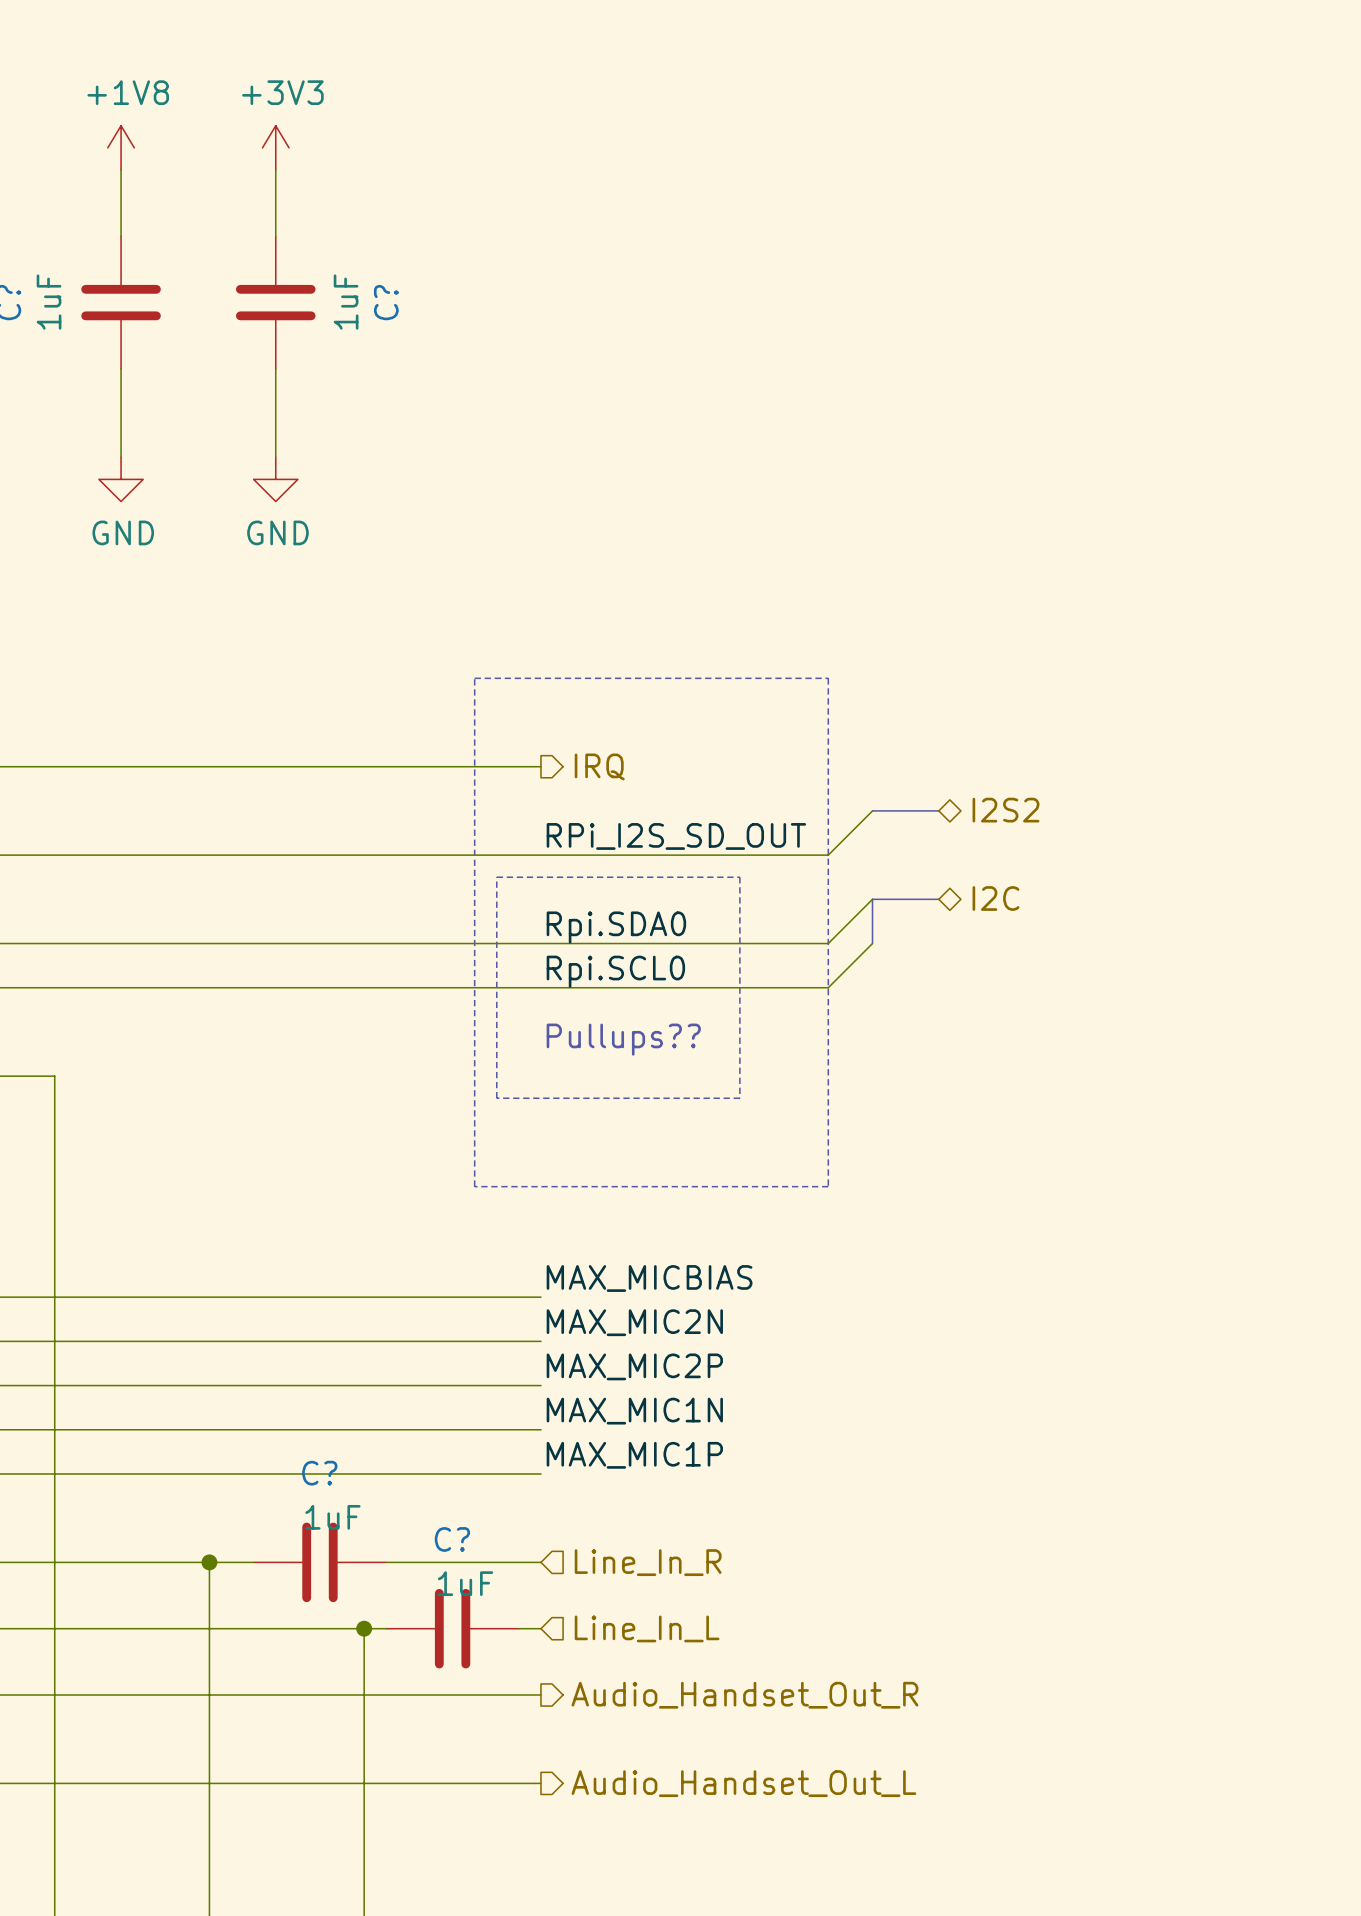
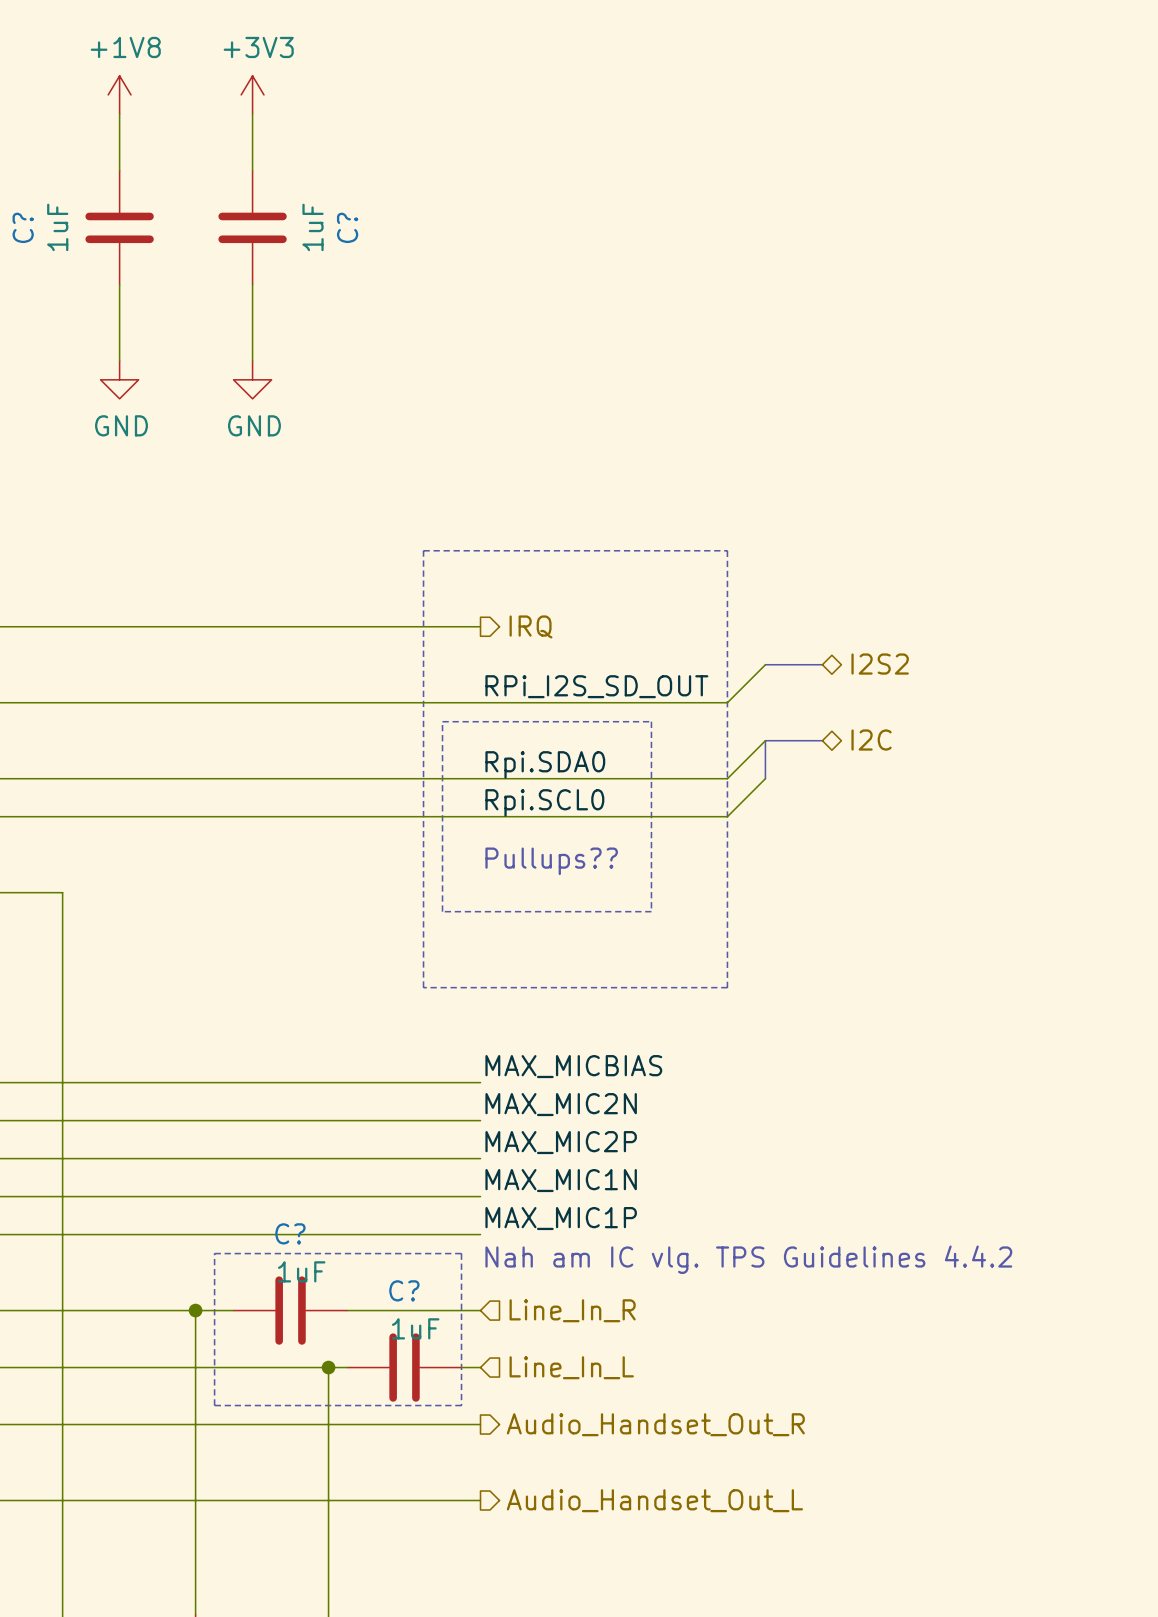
line: none -> (214, 1253) (461, 1253) (461, 1405) (214, 1405) (214, 1253)
text: none -> Nah am IC vlg. TPS Guidelines 4.4.2 (748, 1259)

